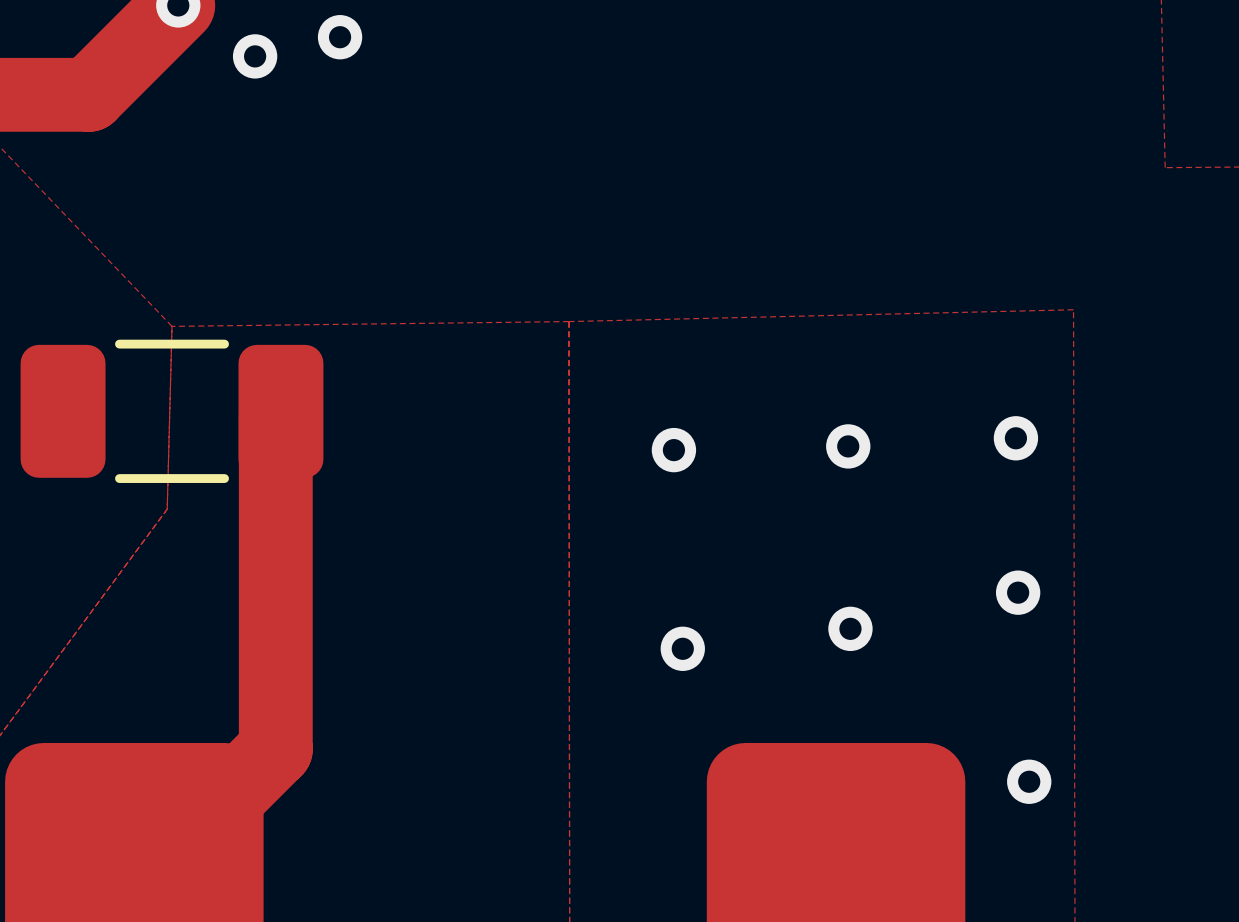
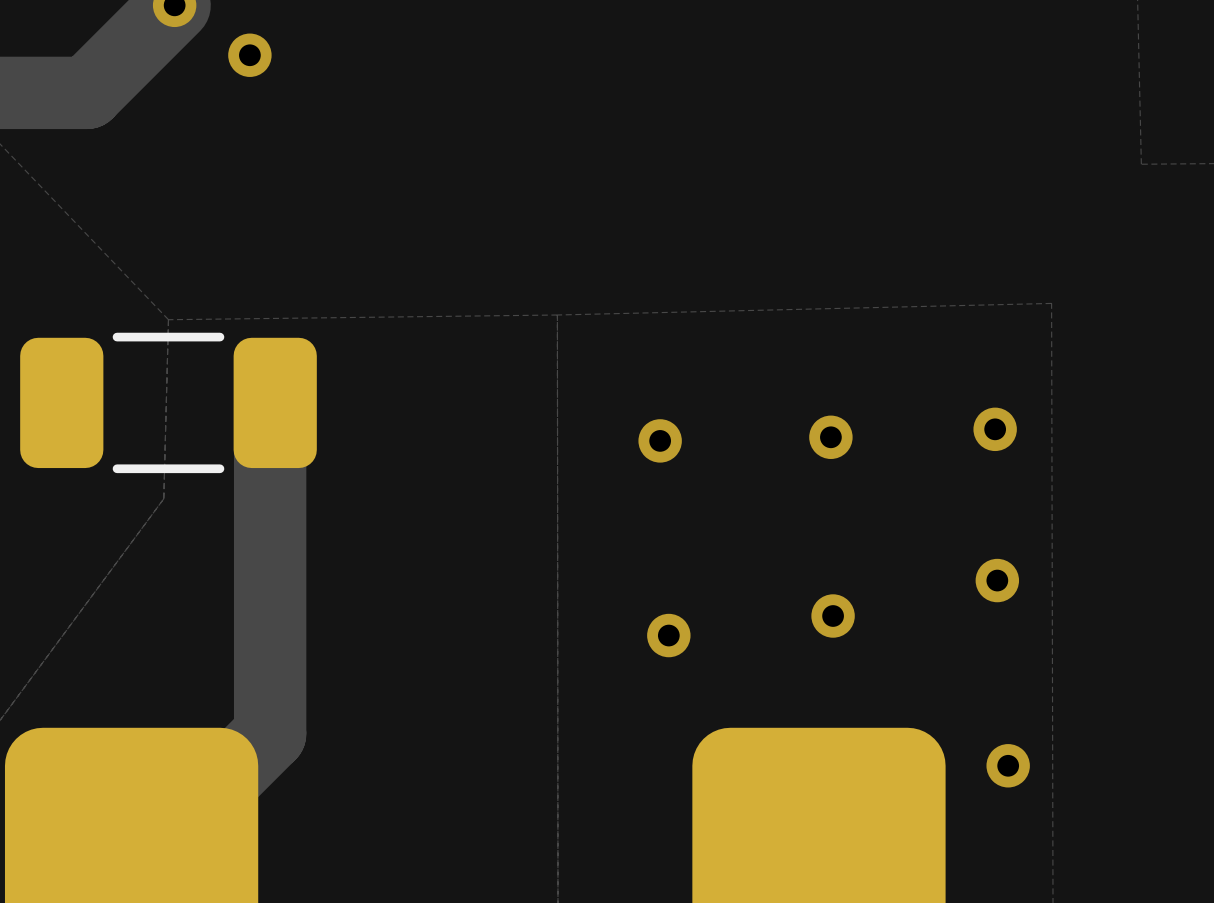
via: (340, 37) -> none

